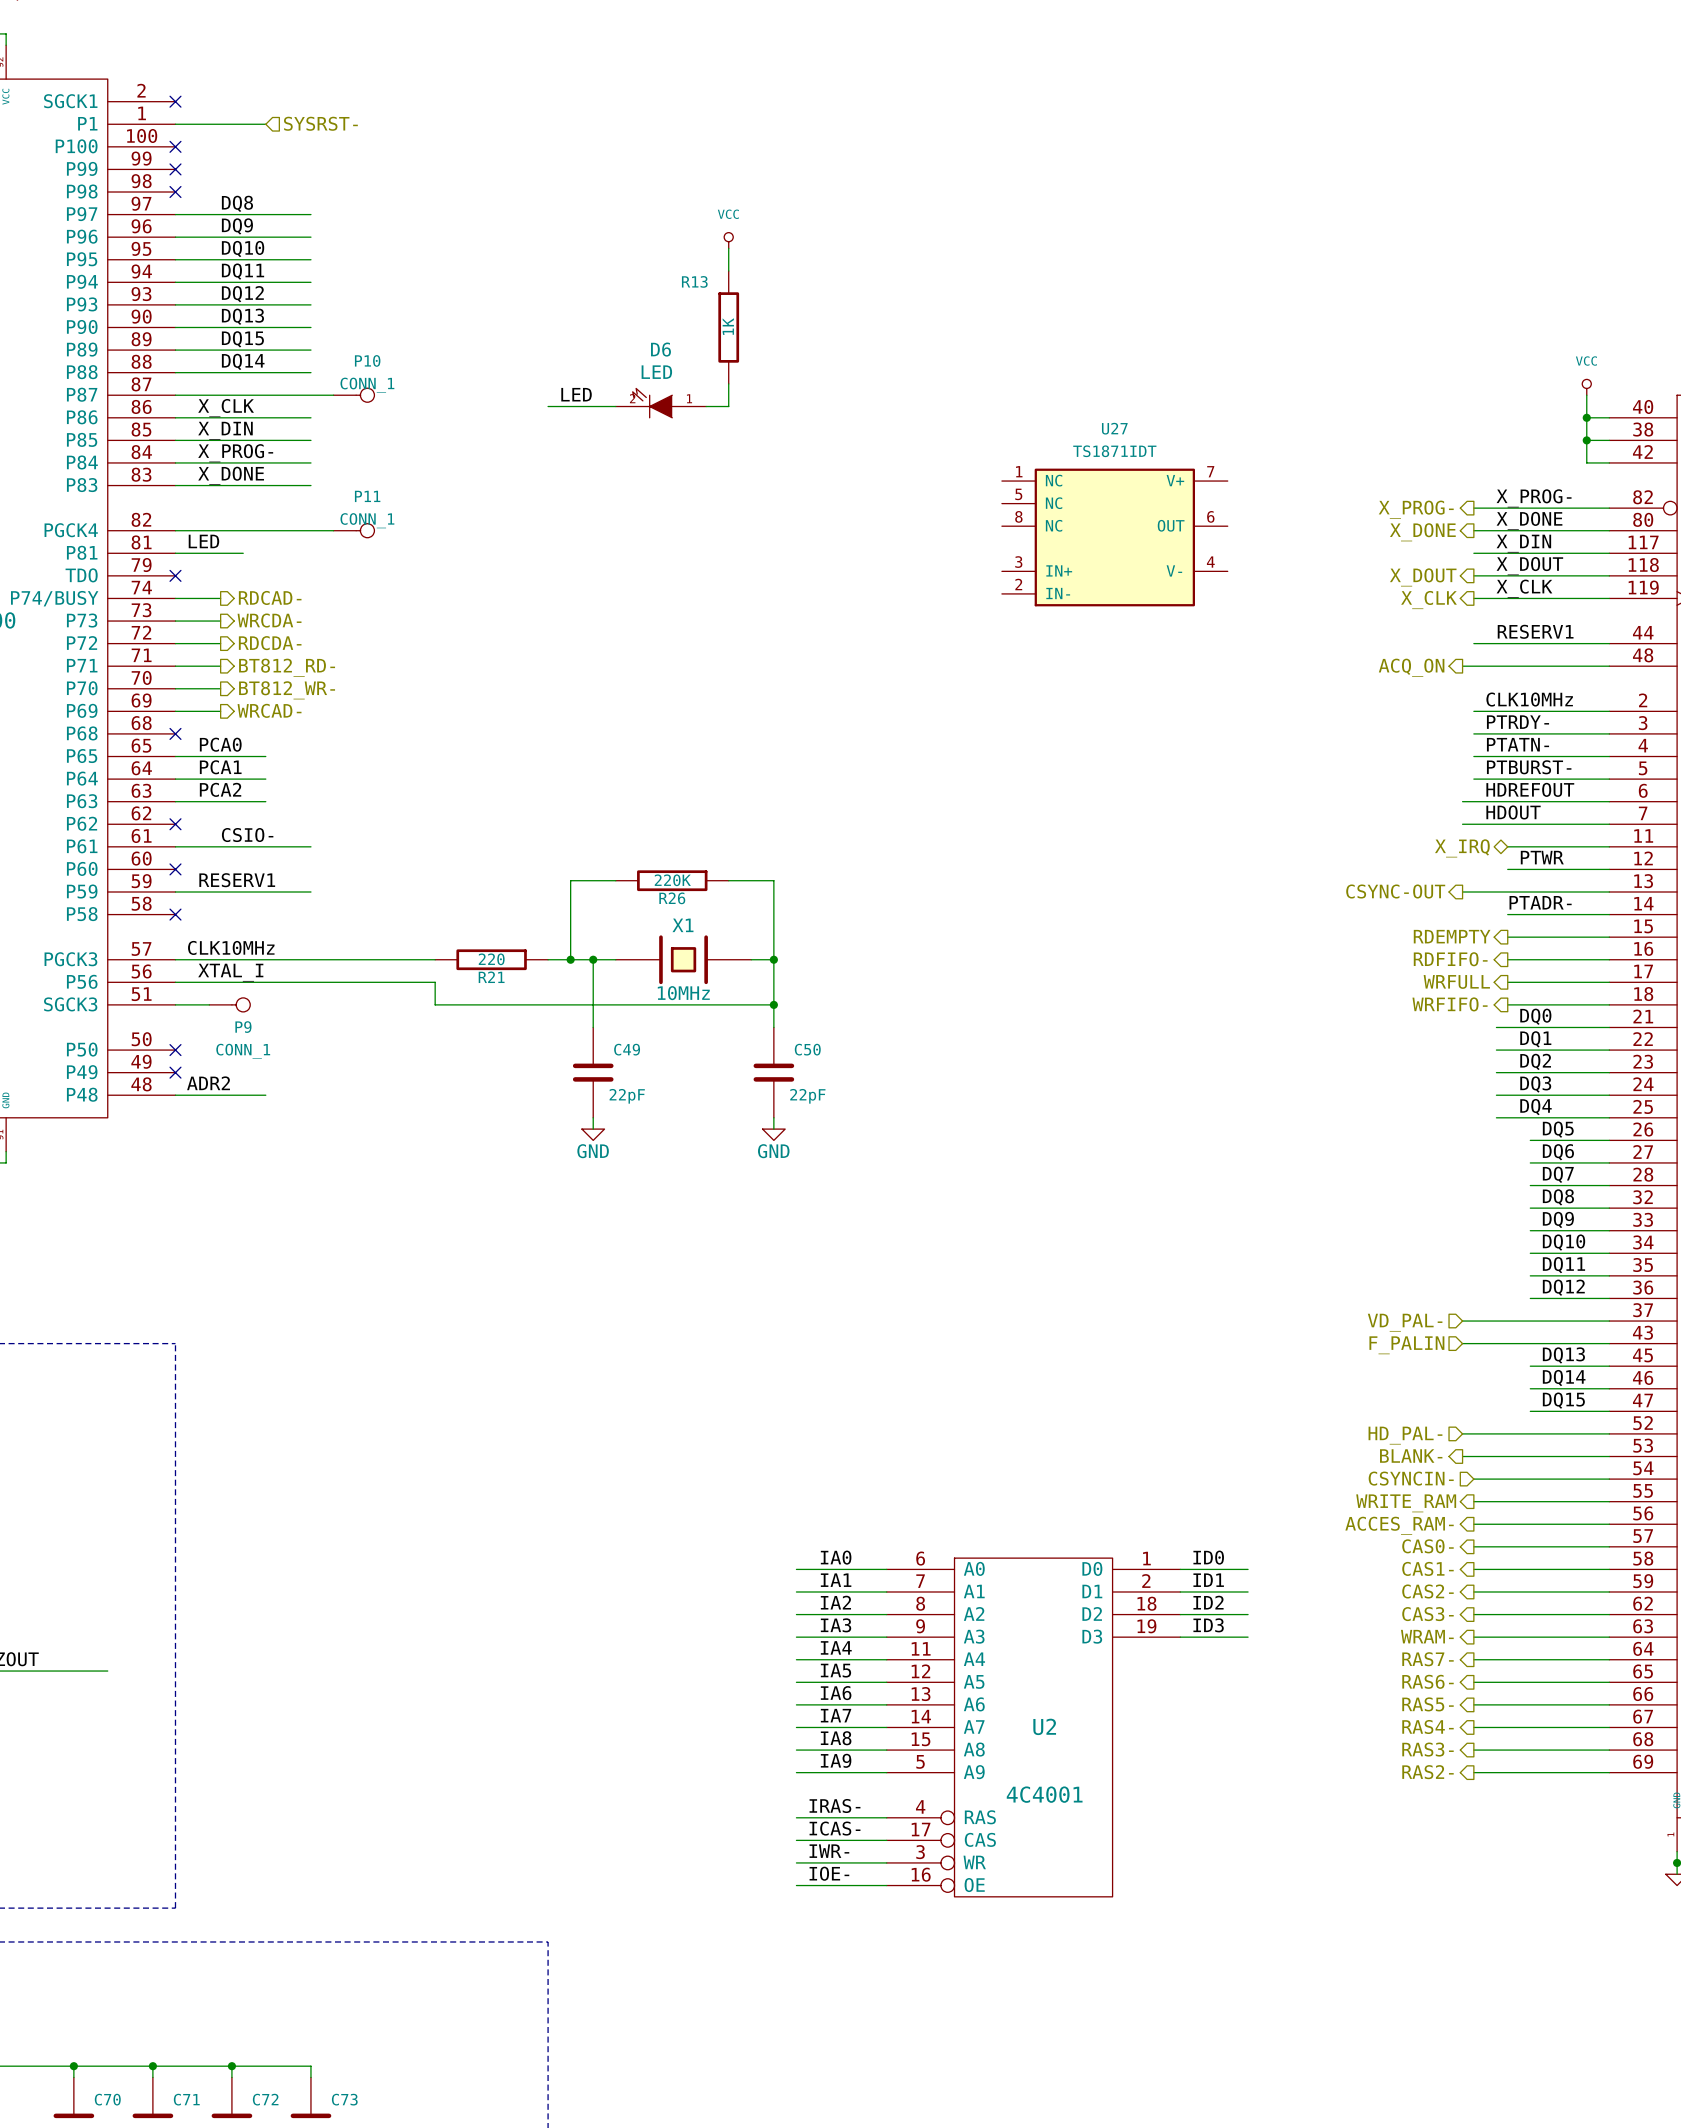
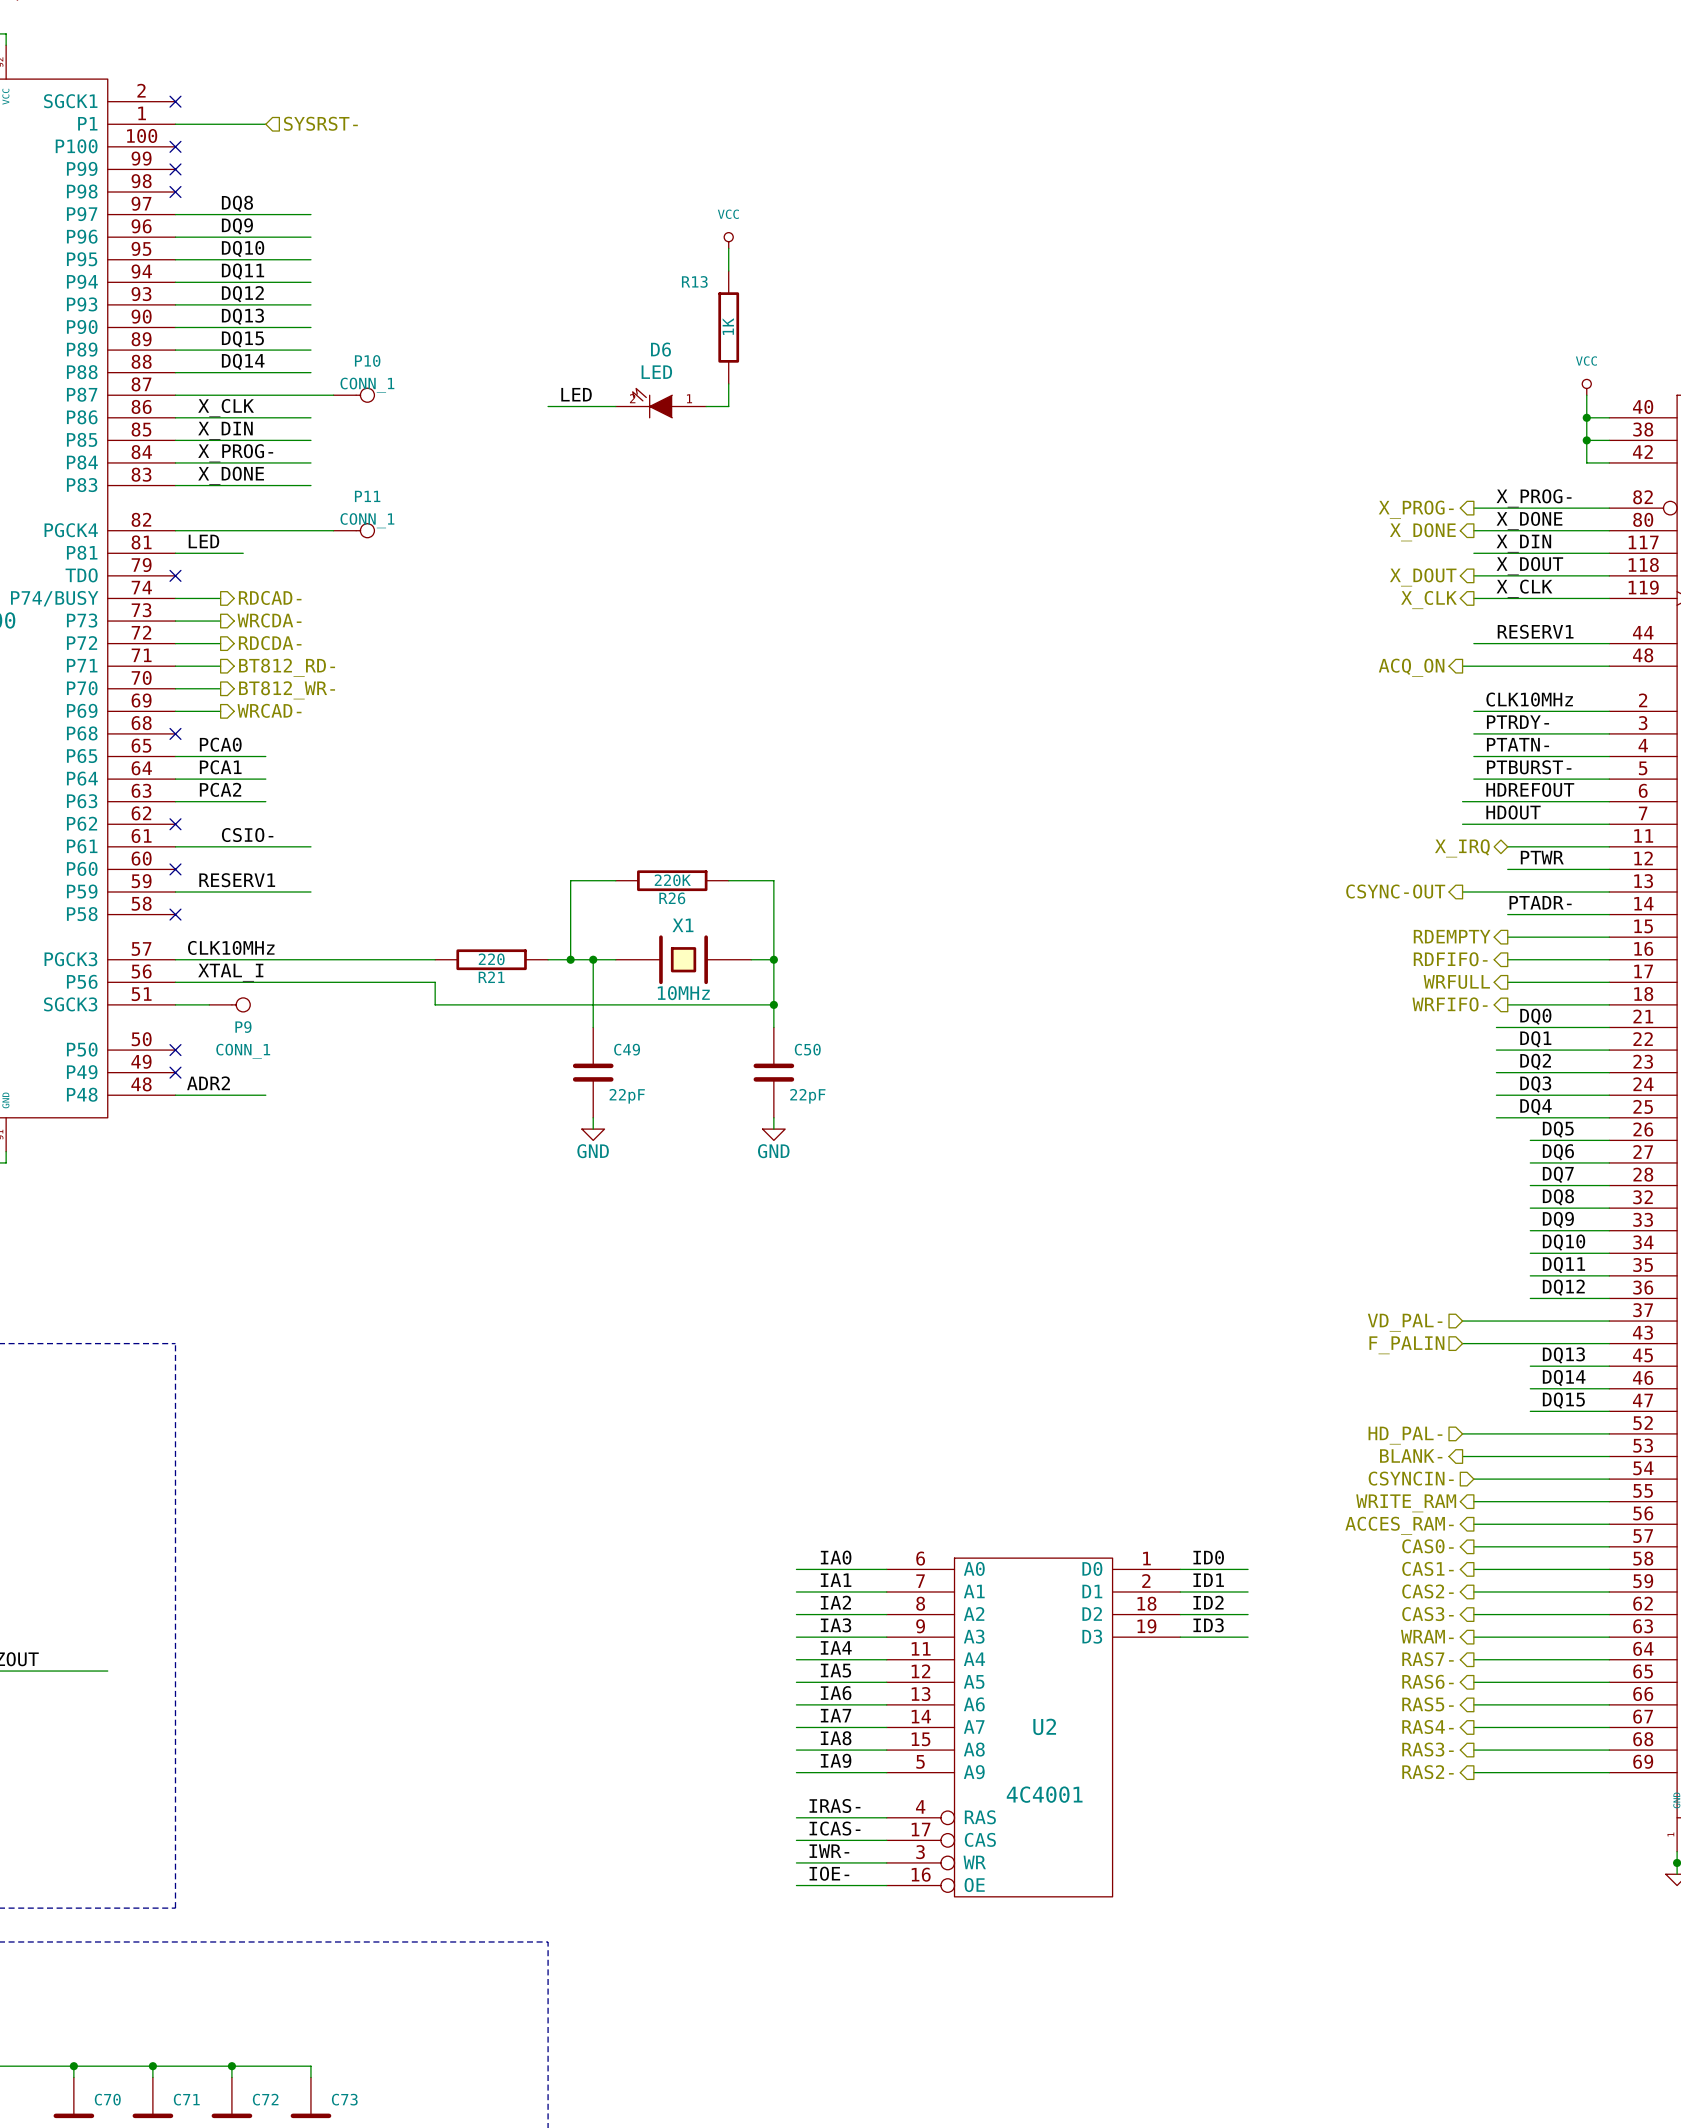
U27: TS1871IDT (1114, 537) -> none

